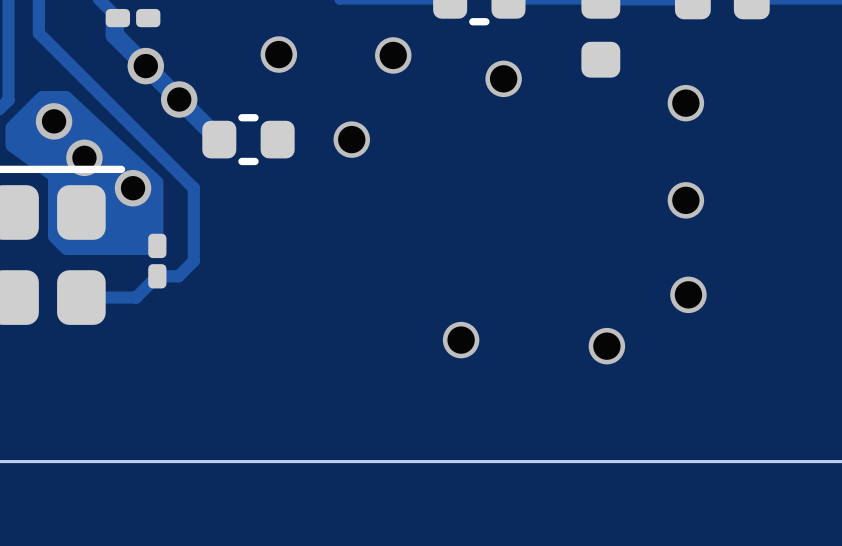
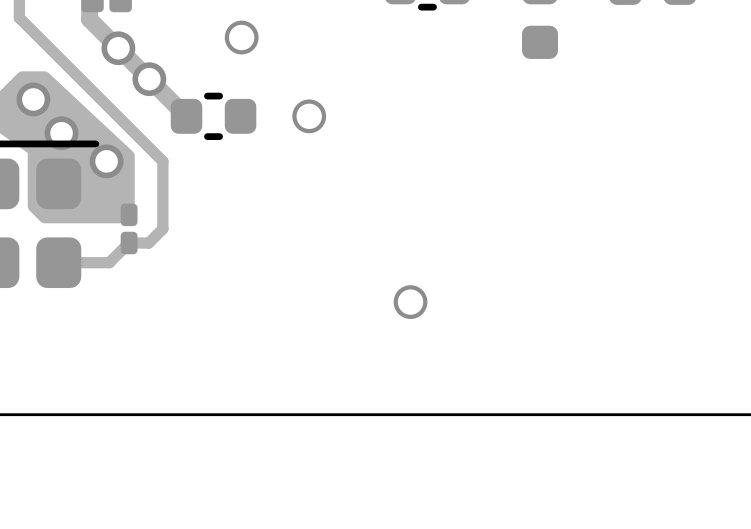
via: (393, 55) -> none
via: (503, 78) -> none
via: (685, 103) -> none
via: (685, 200) -> none
via: (688, 294) -> none
via: (606, 346) -> none

